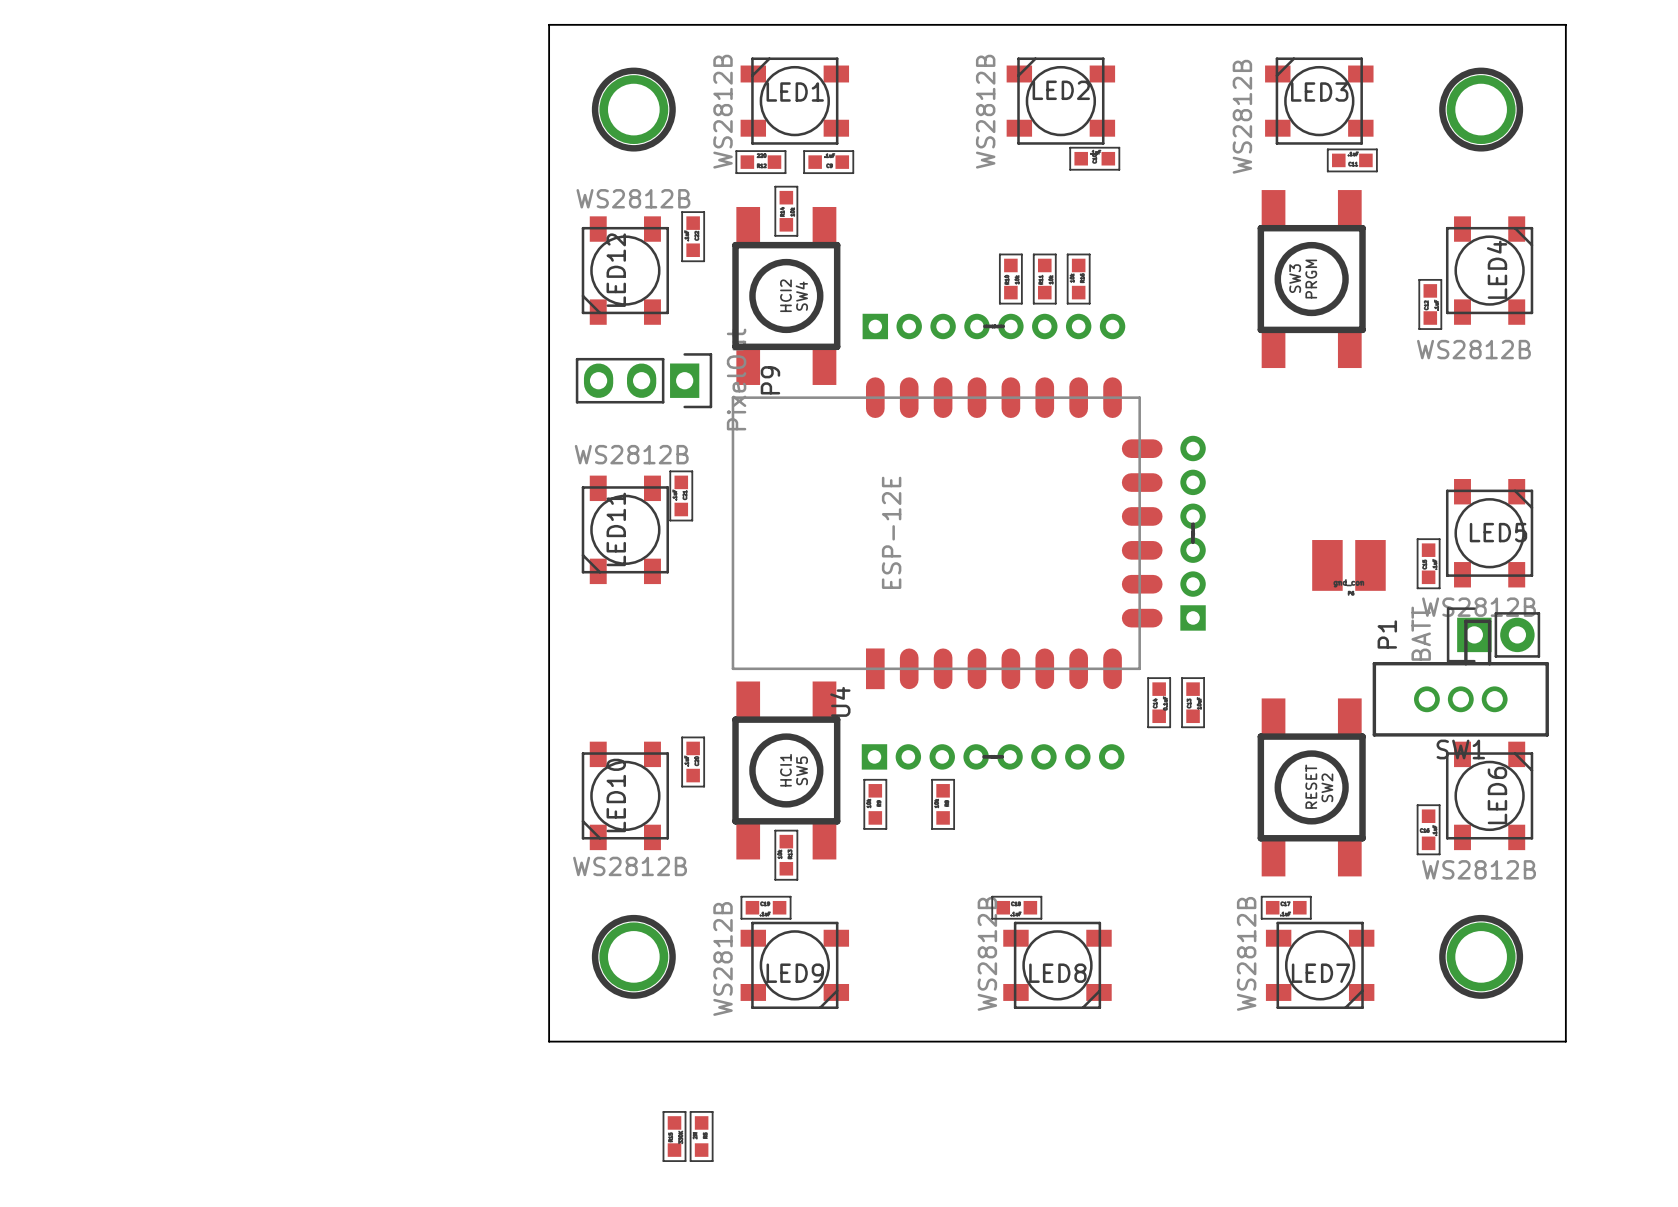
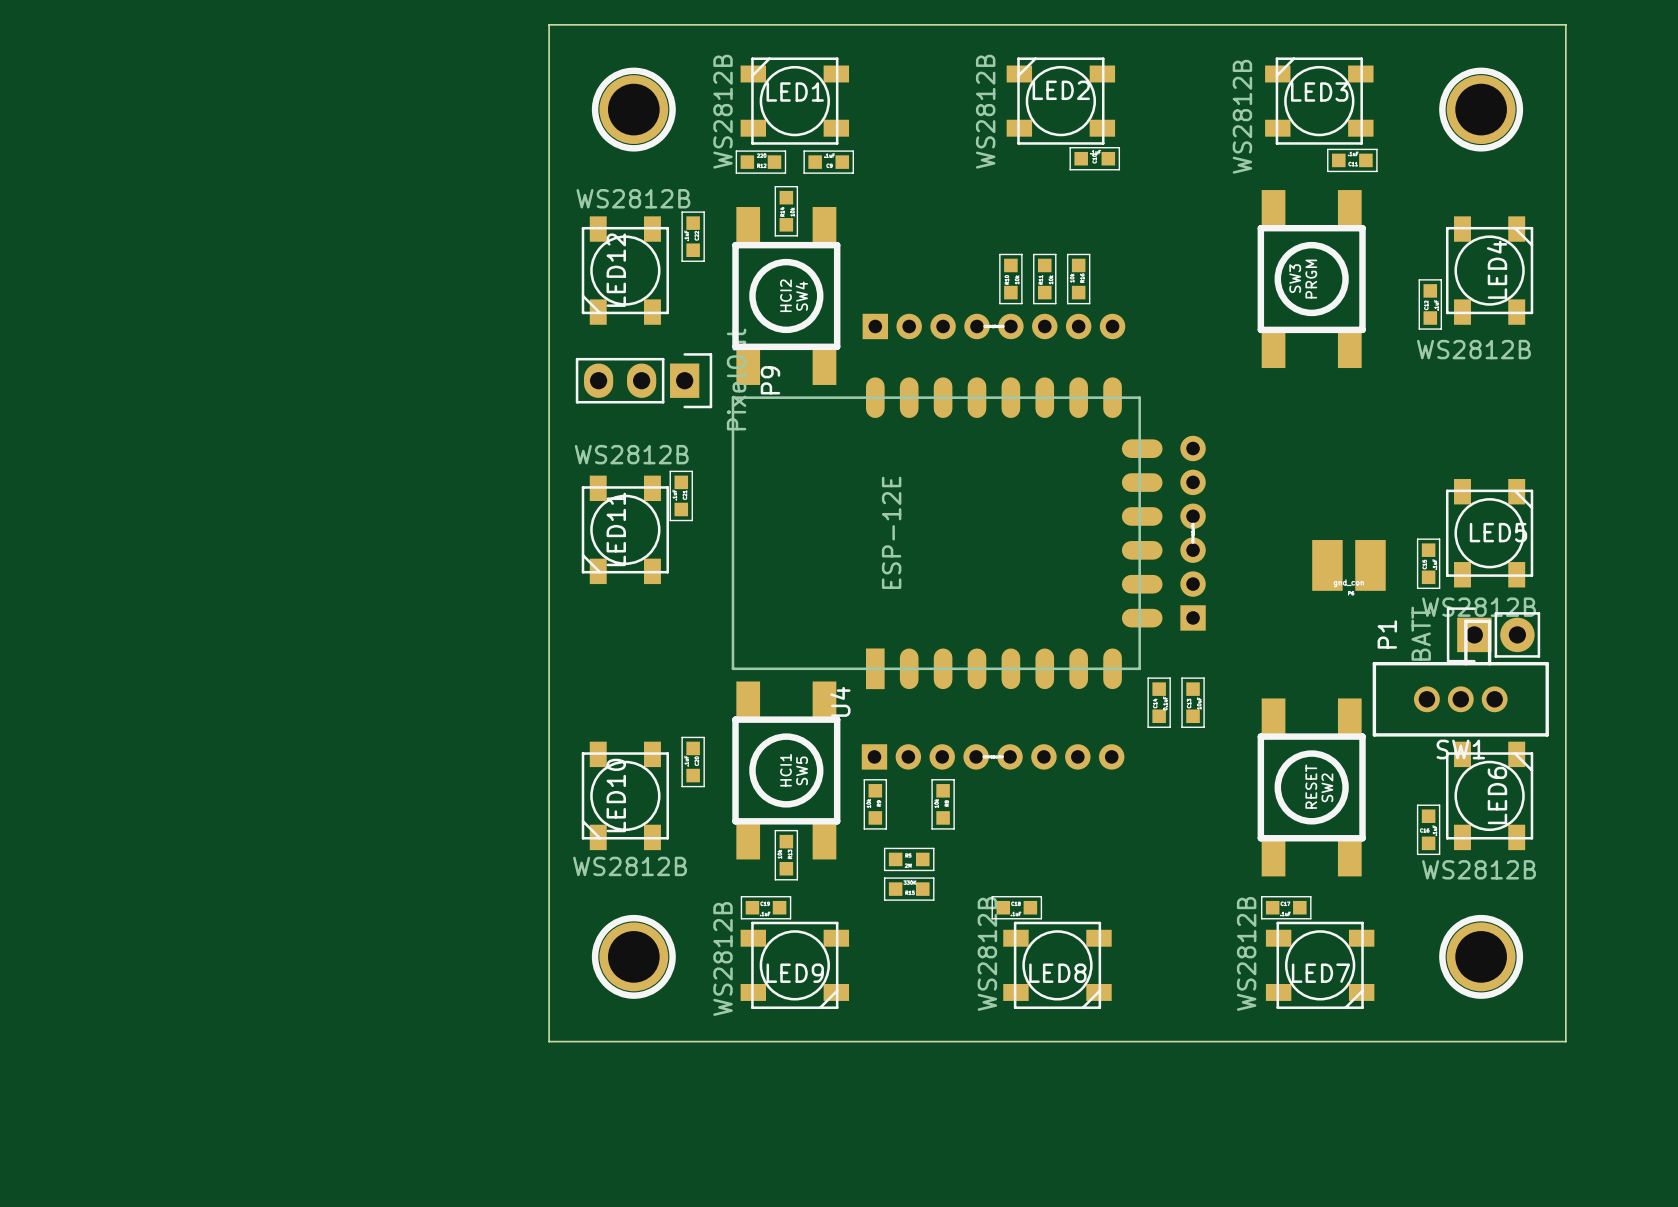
part rotation: 0° (674, 1136) -> 90° clockwise (909, 889)
part position: (674, 1136) -> (909, 889)
part rotation: 0° (701, 1136) -> 90° clockwise (909, 859)
part position: (701, 1136) -> (909, 859)

